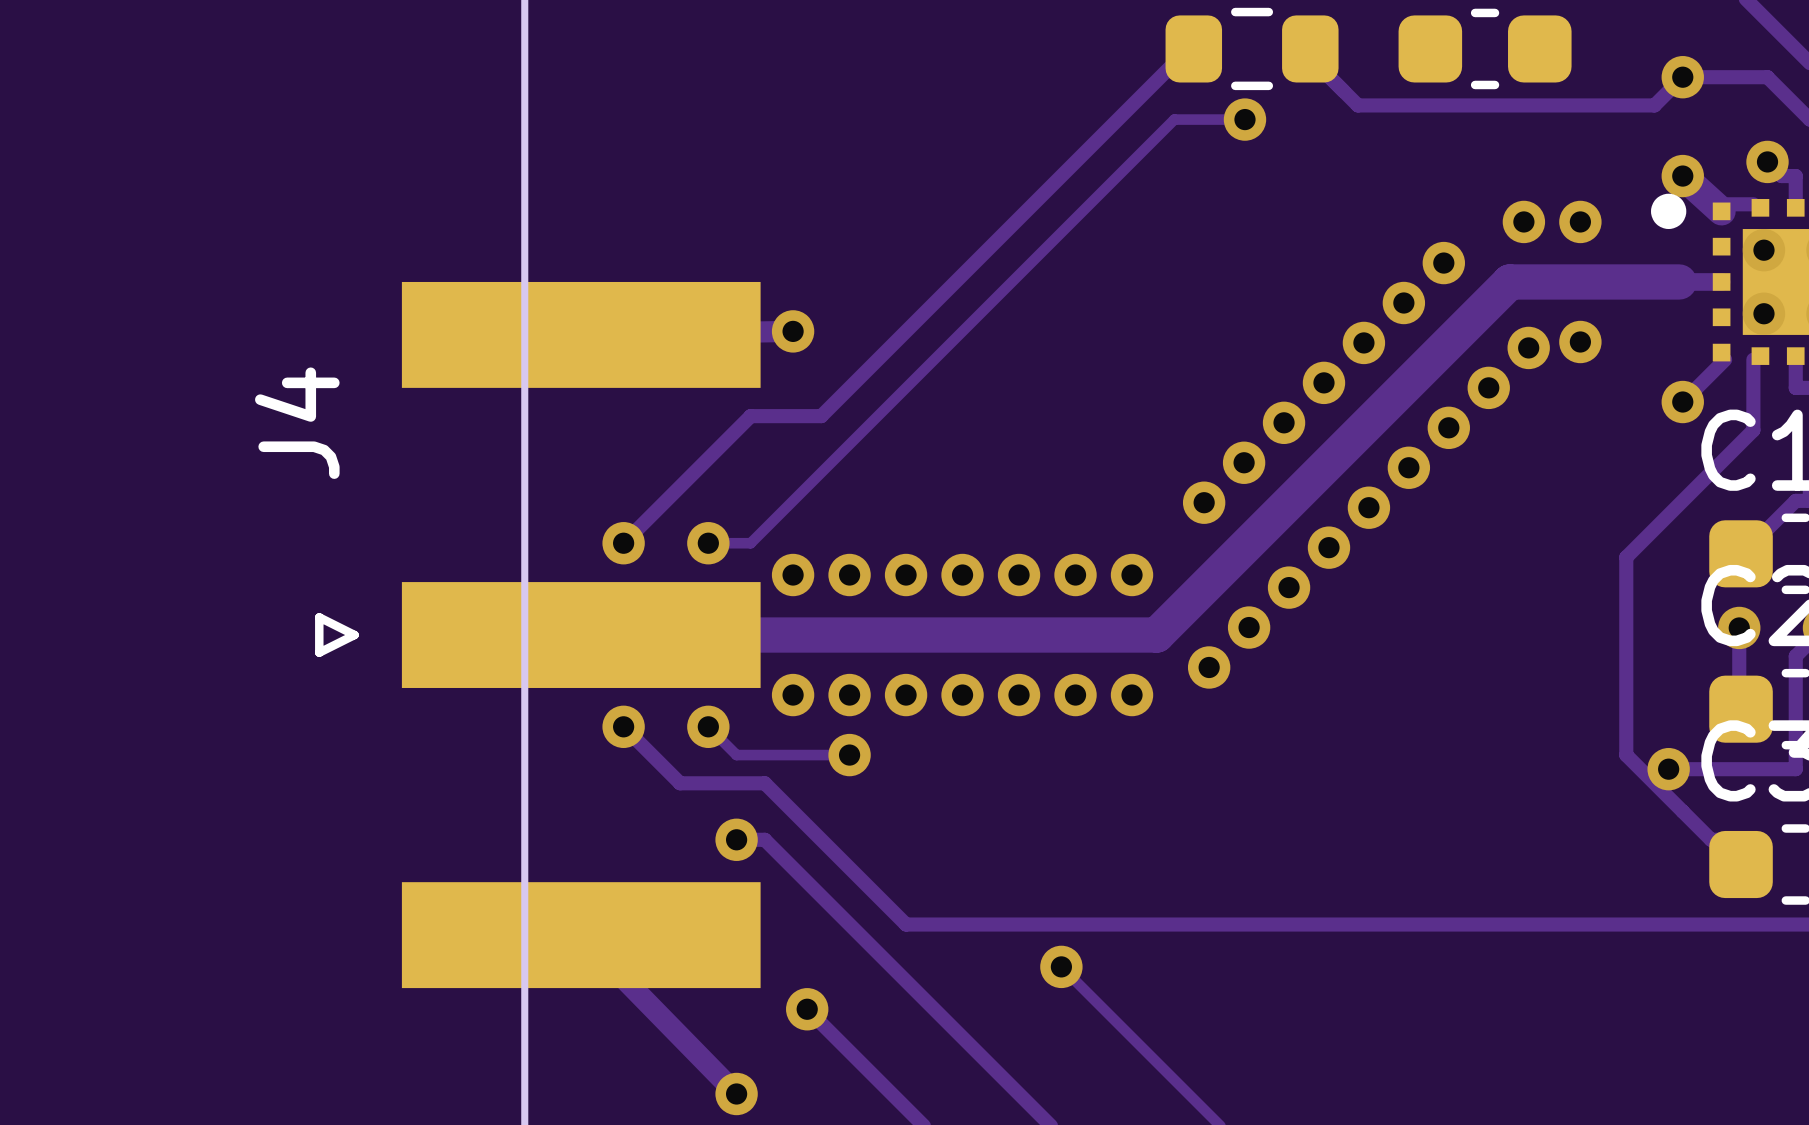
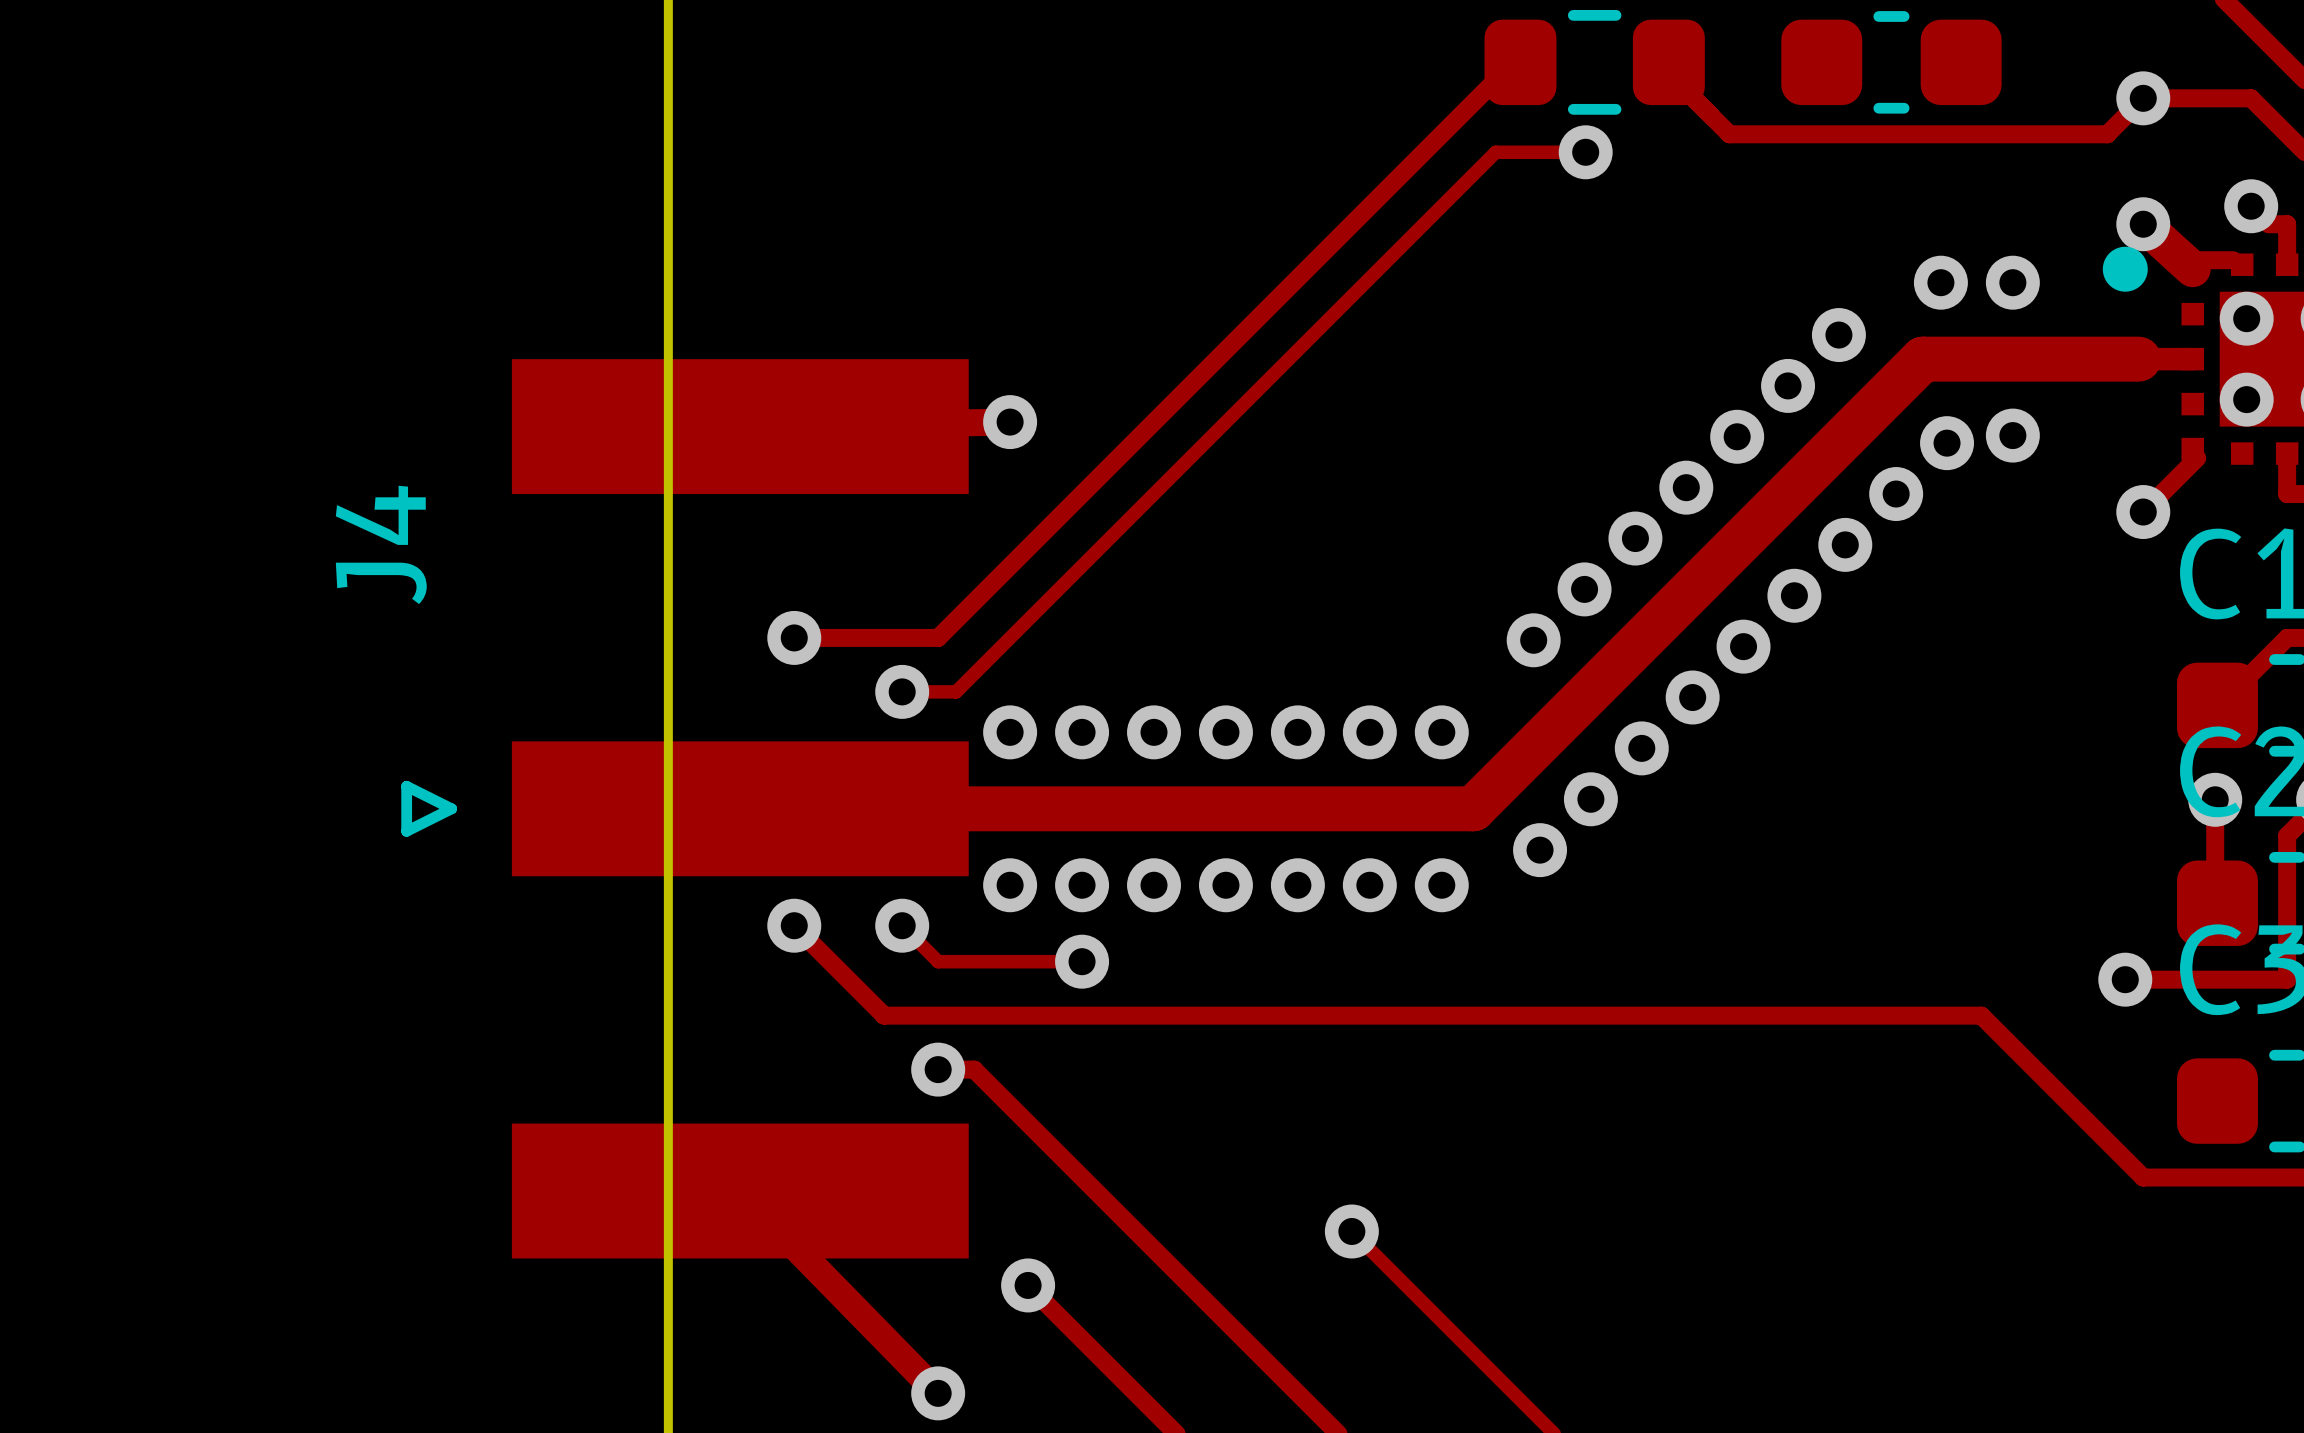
track: (1753, 359) (1753, 430) (1626, 557) (1626, 755) (1711, 839) (1725, 839) -> none
track: (821, 416) (750, 416) (623, 543) -> (1046, 530) (938, 637) (794, 637)
via position: (623, 543) -> (794, 637)
track: (680, 783) (764, 783) (906, 924) (1682, 924) -> (866, 997) (884, 1015) (1981, 1015) (2143, 1177)

